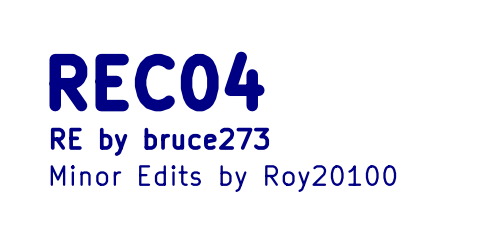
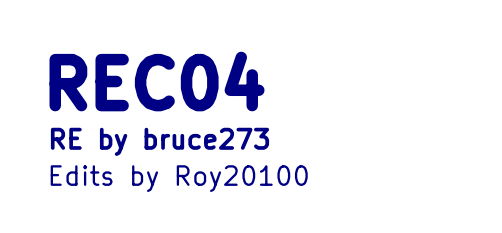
text: Minor Edits by Roy20100 (223, 178) -> Edits by Roy20100 (179, 178)

